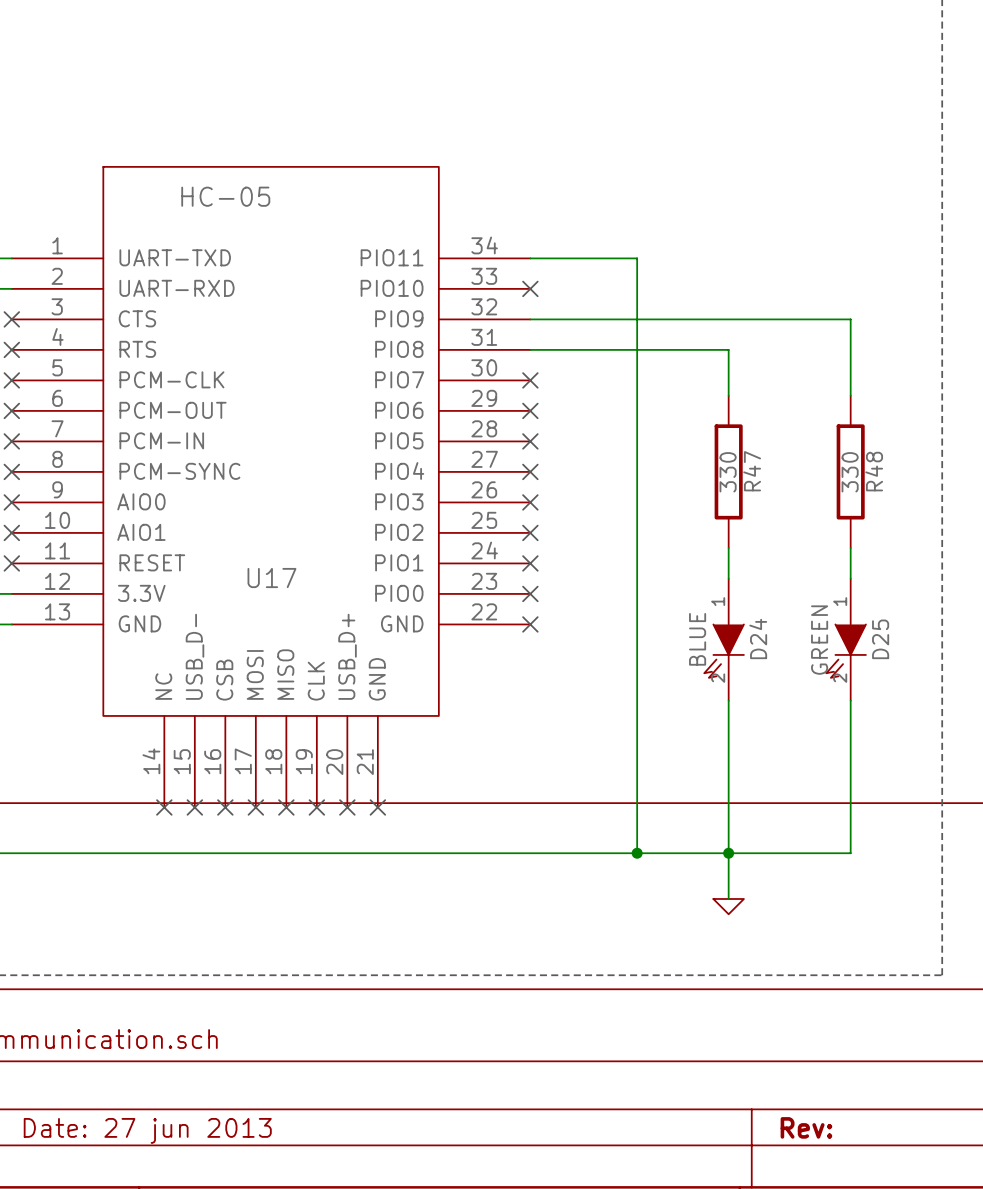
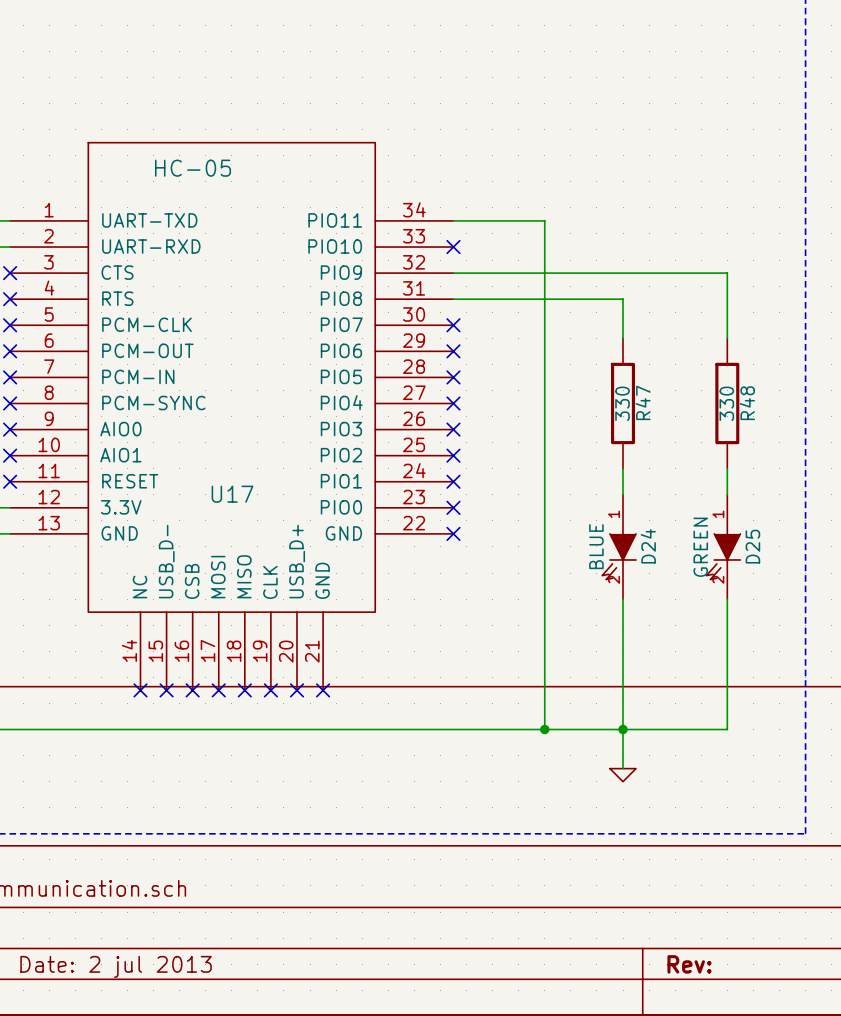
title block: Date: 27 jun 2013 (147, 1130) -> Date: 2 jul 2013 (116, 966)

